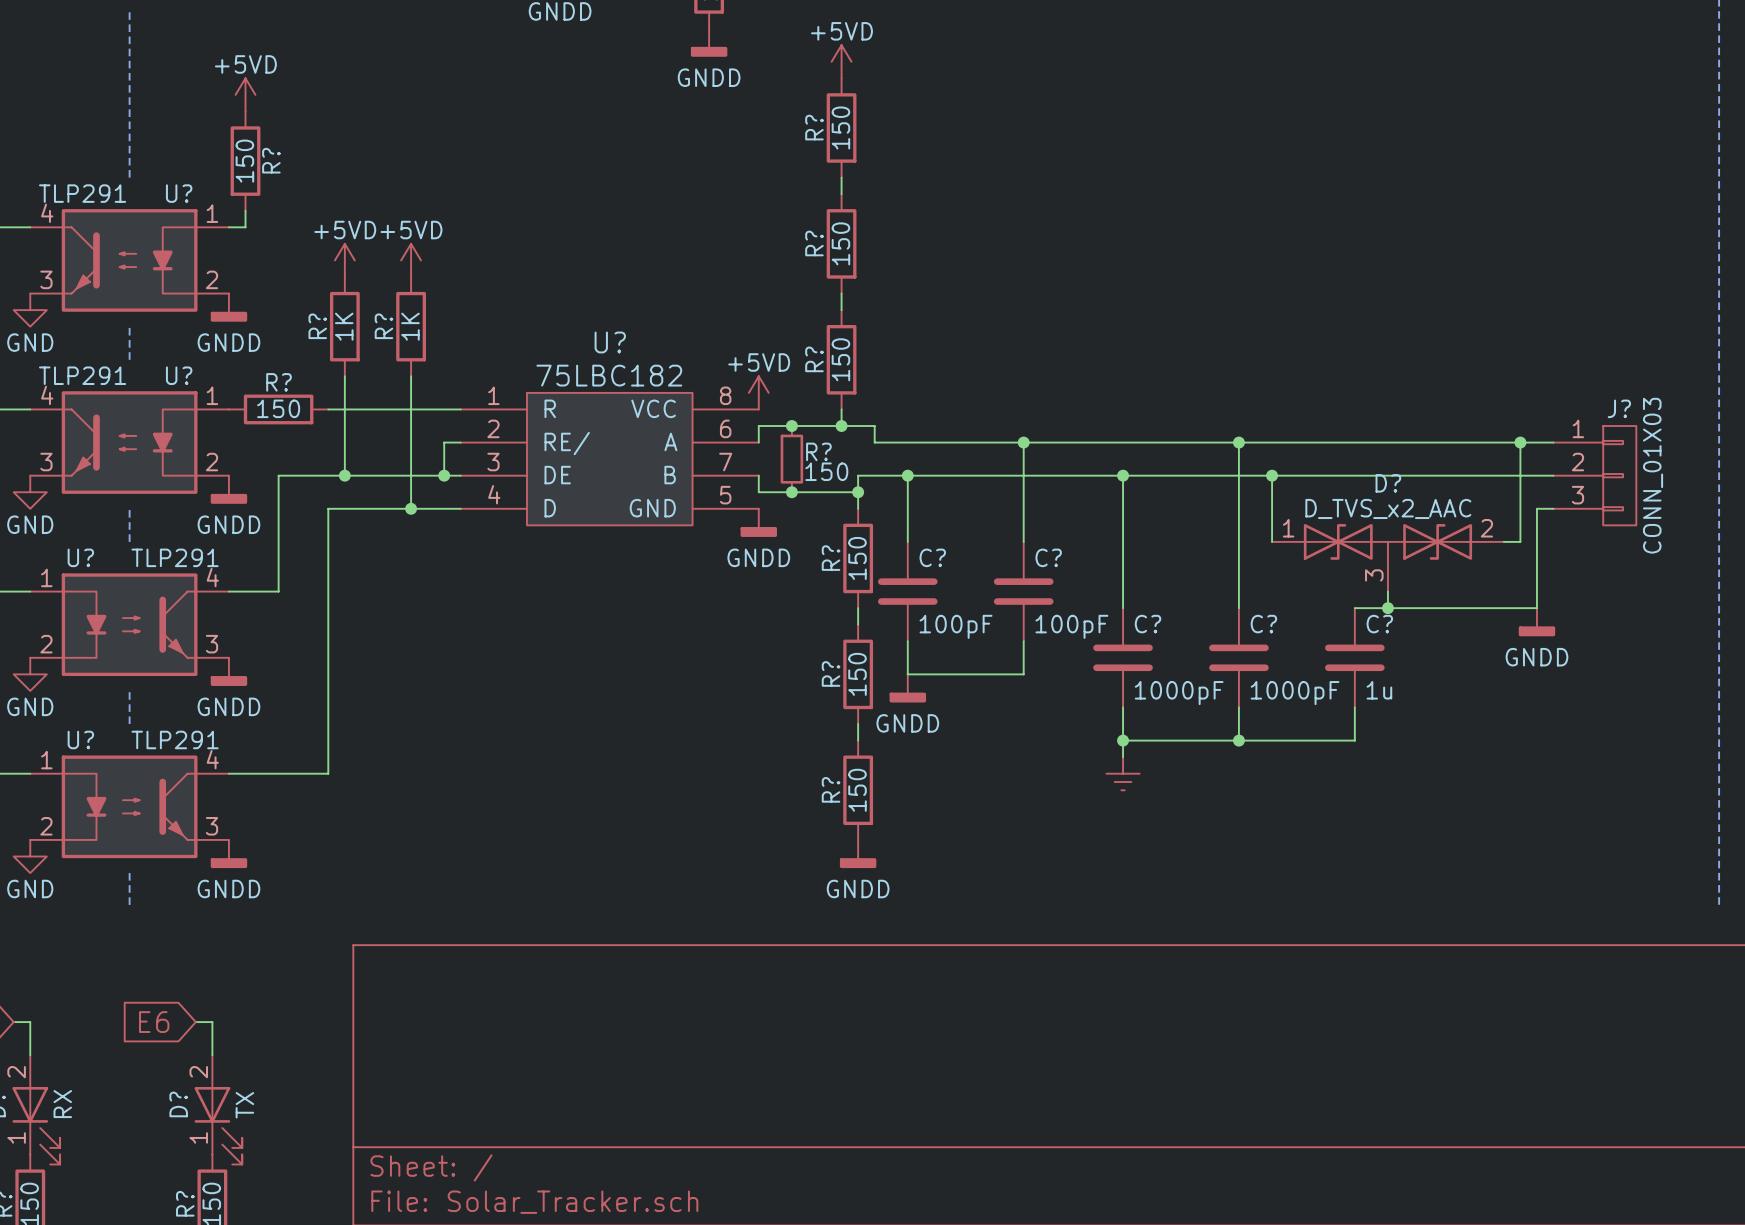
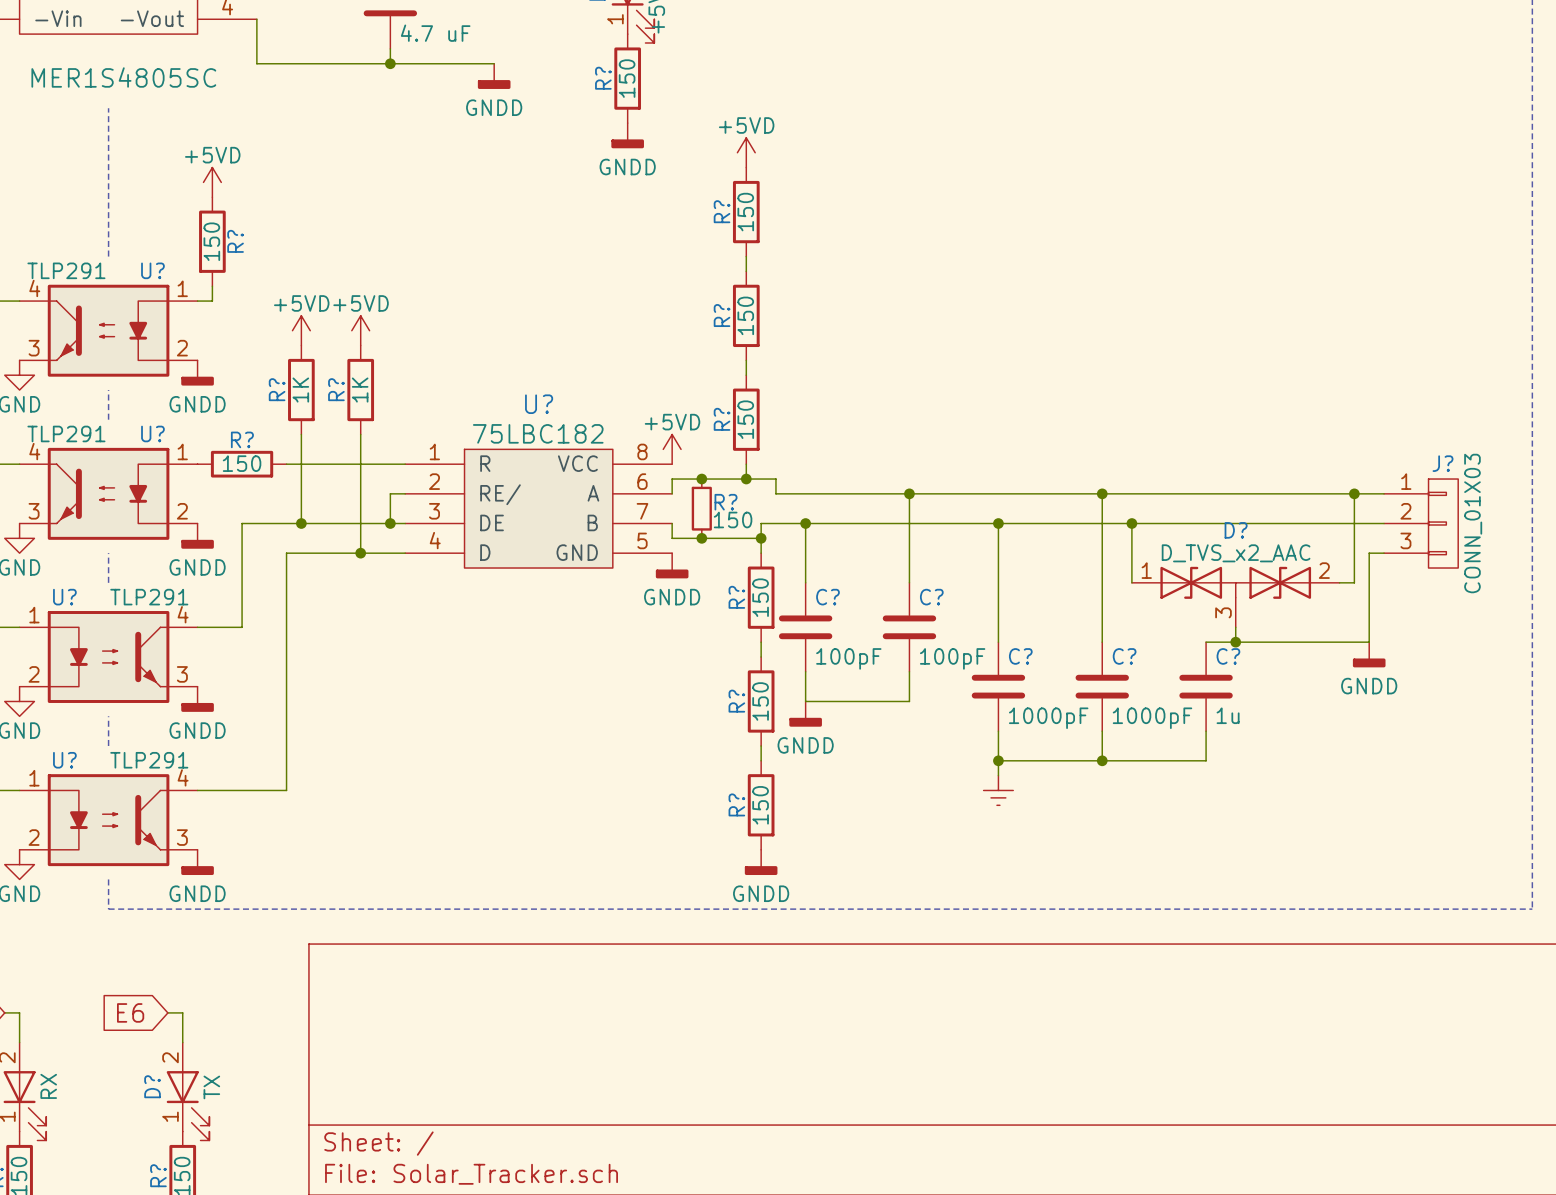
line: none -> (108, 909) (1532, 909)

